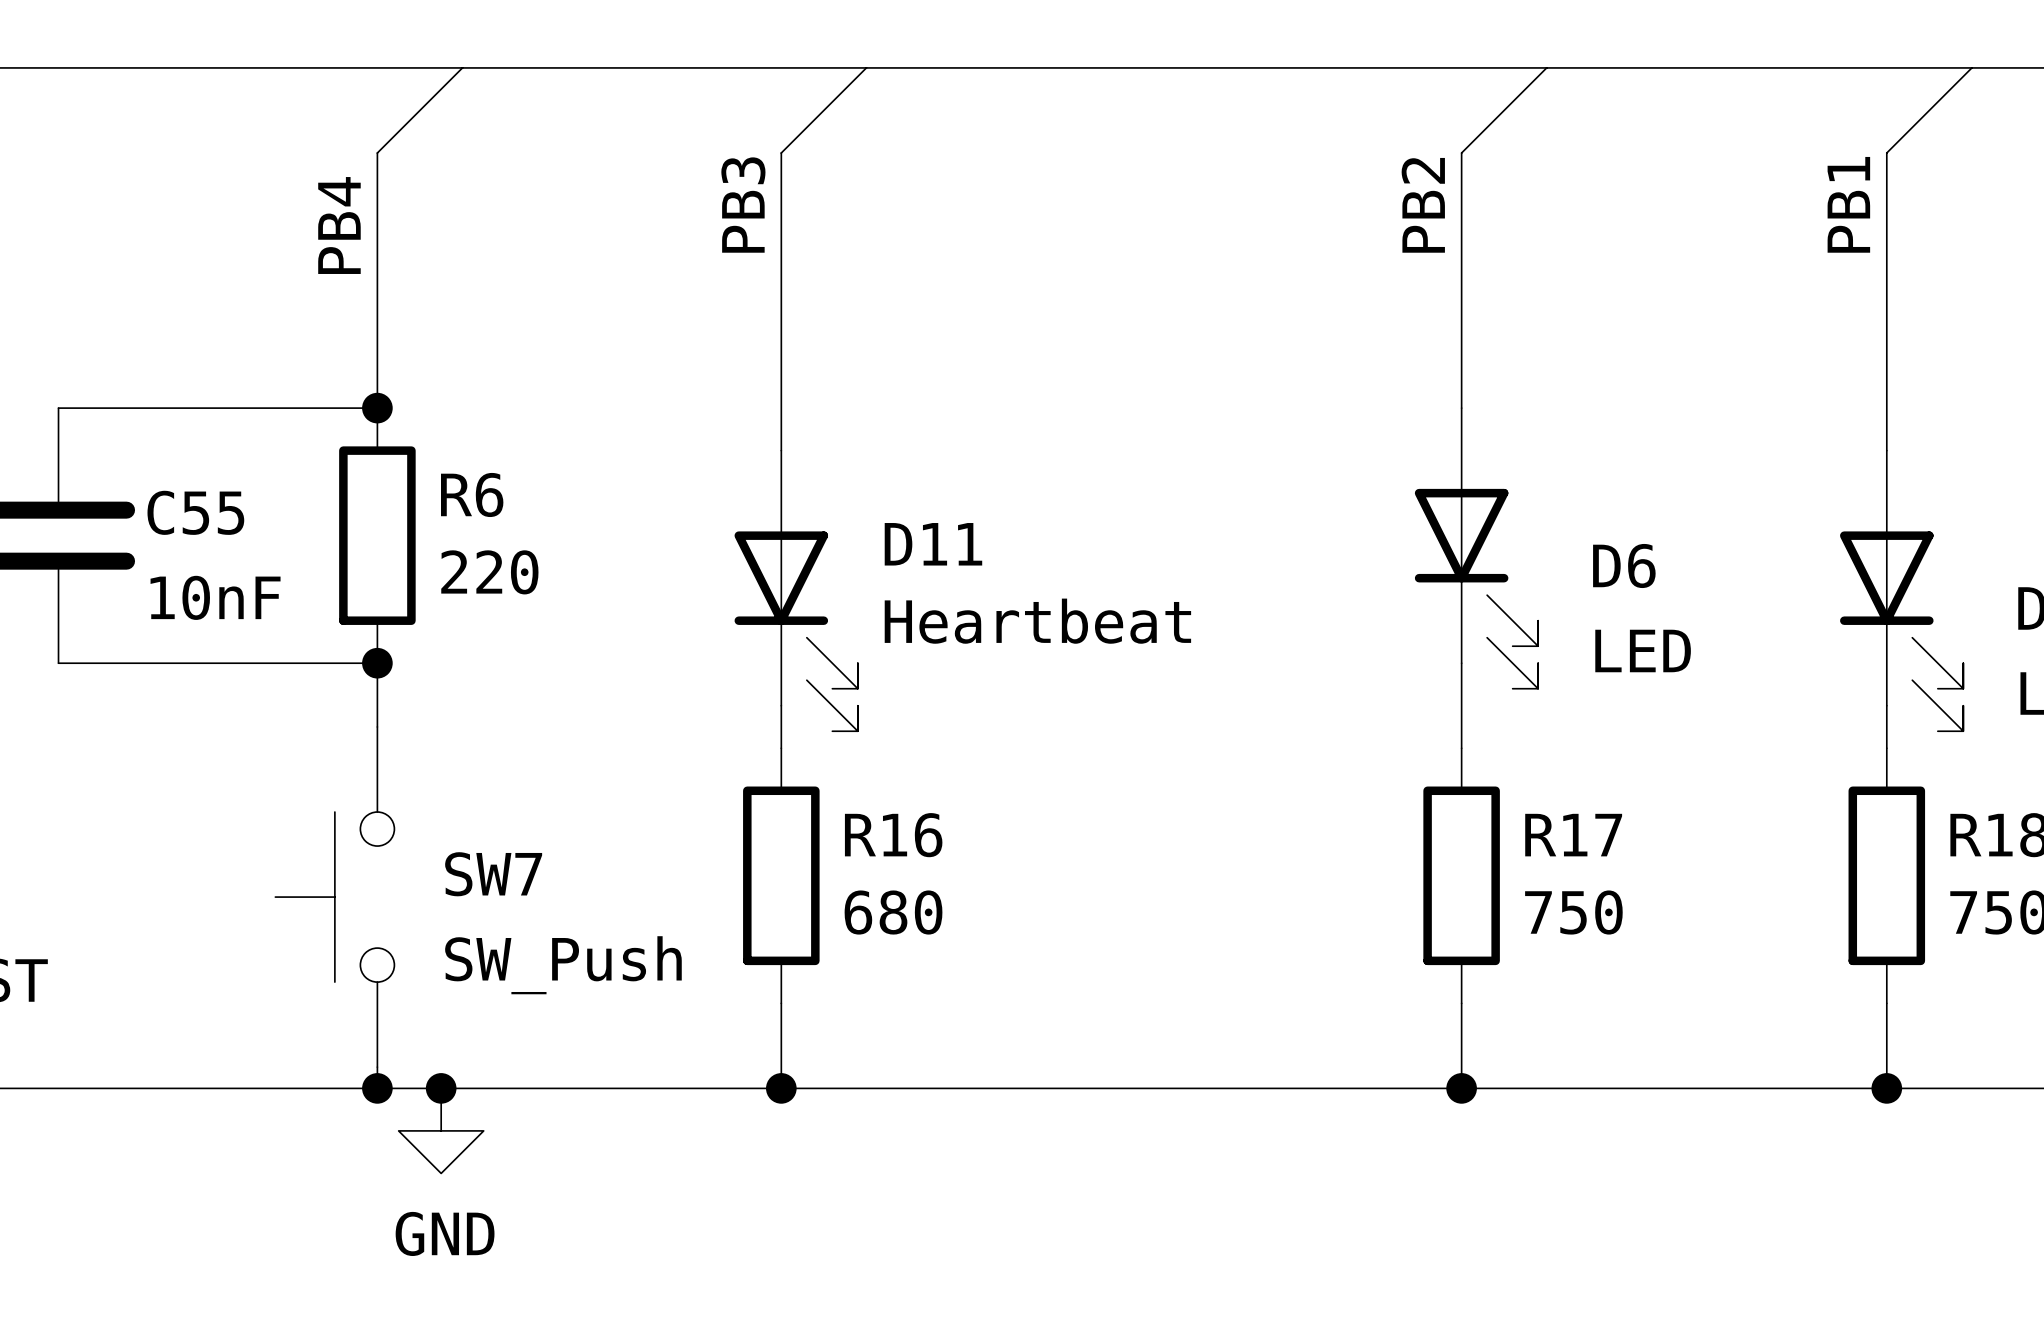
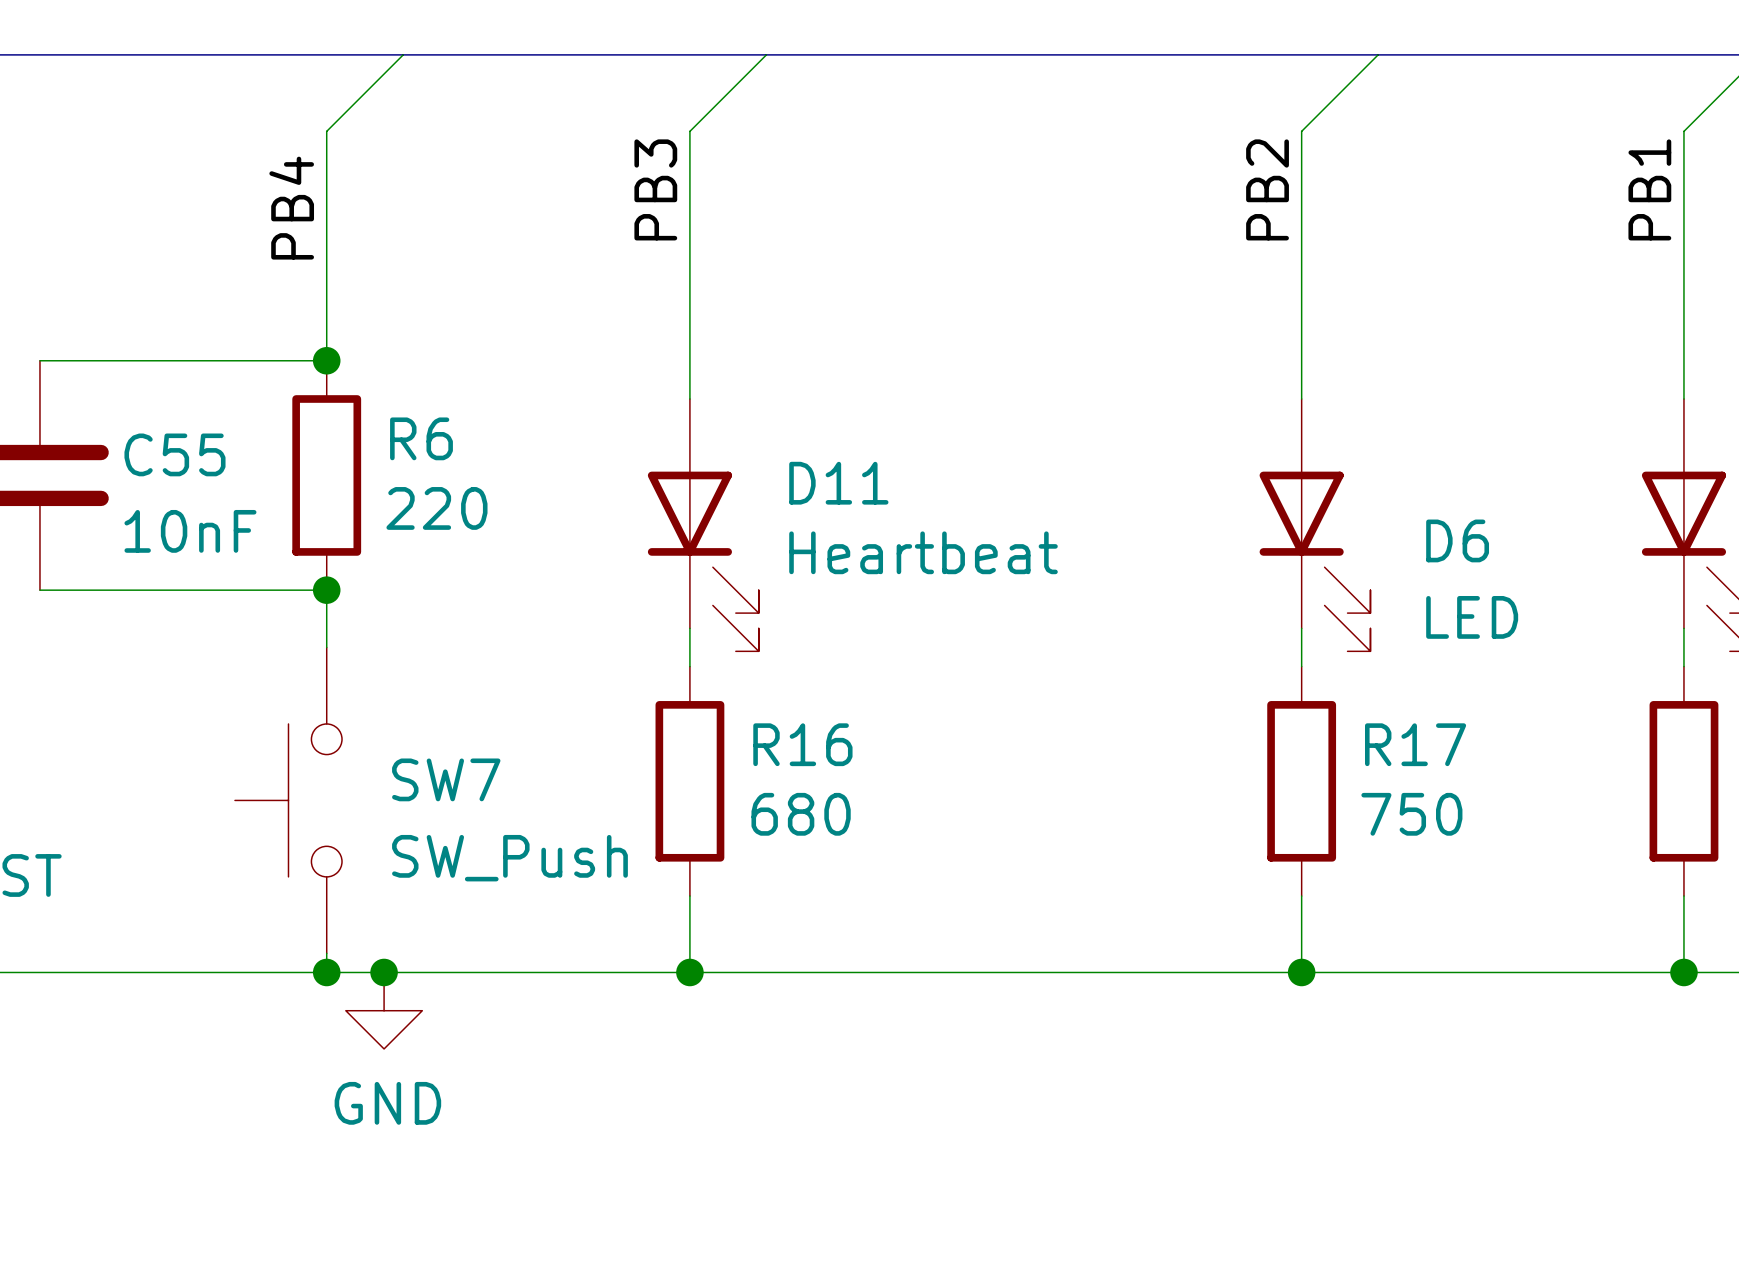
D6 position: (1476, 548) -> (1315, 525)

